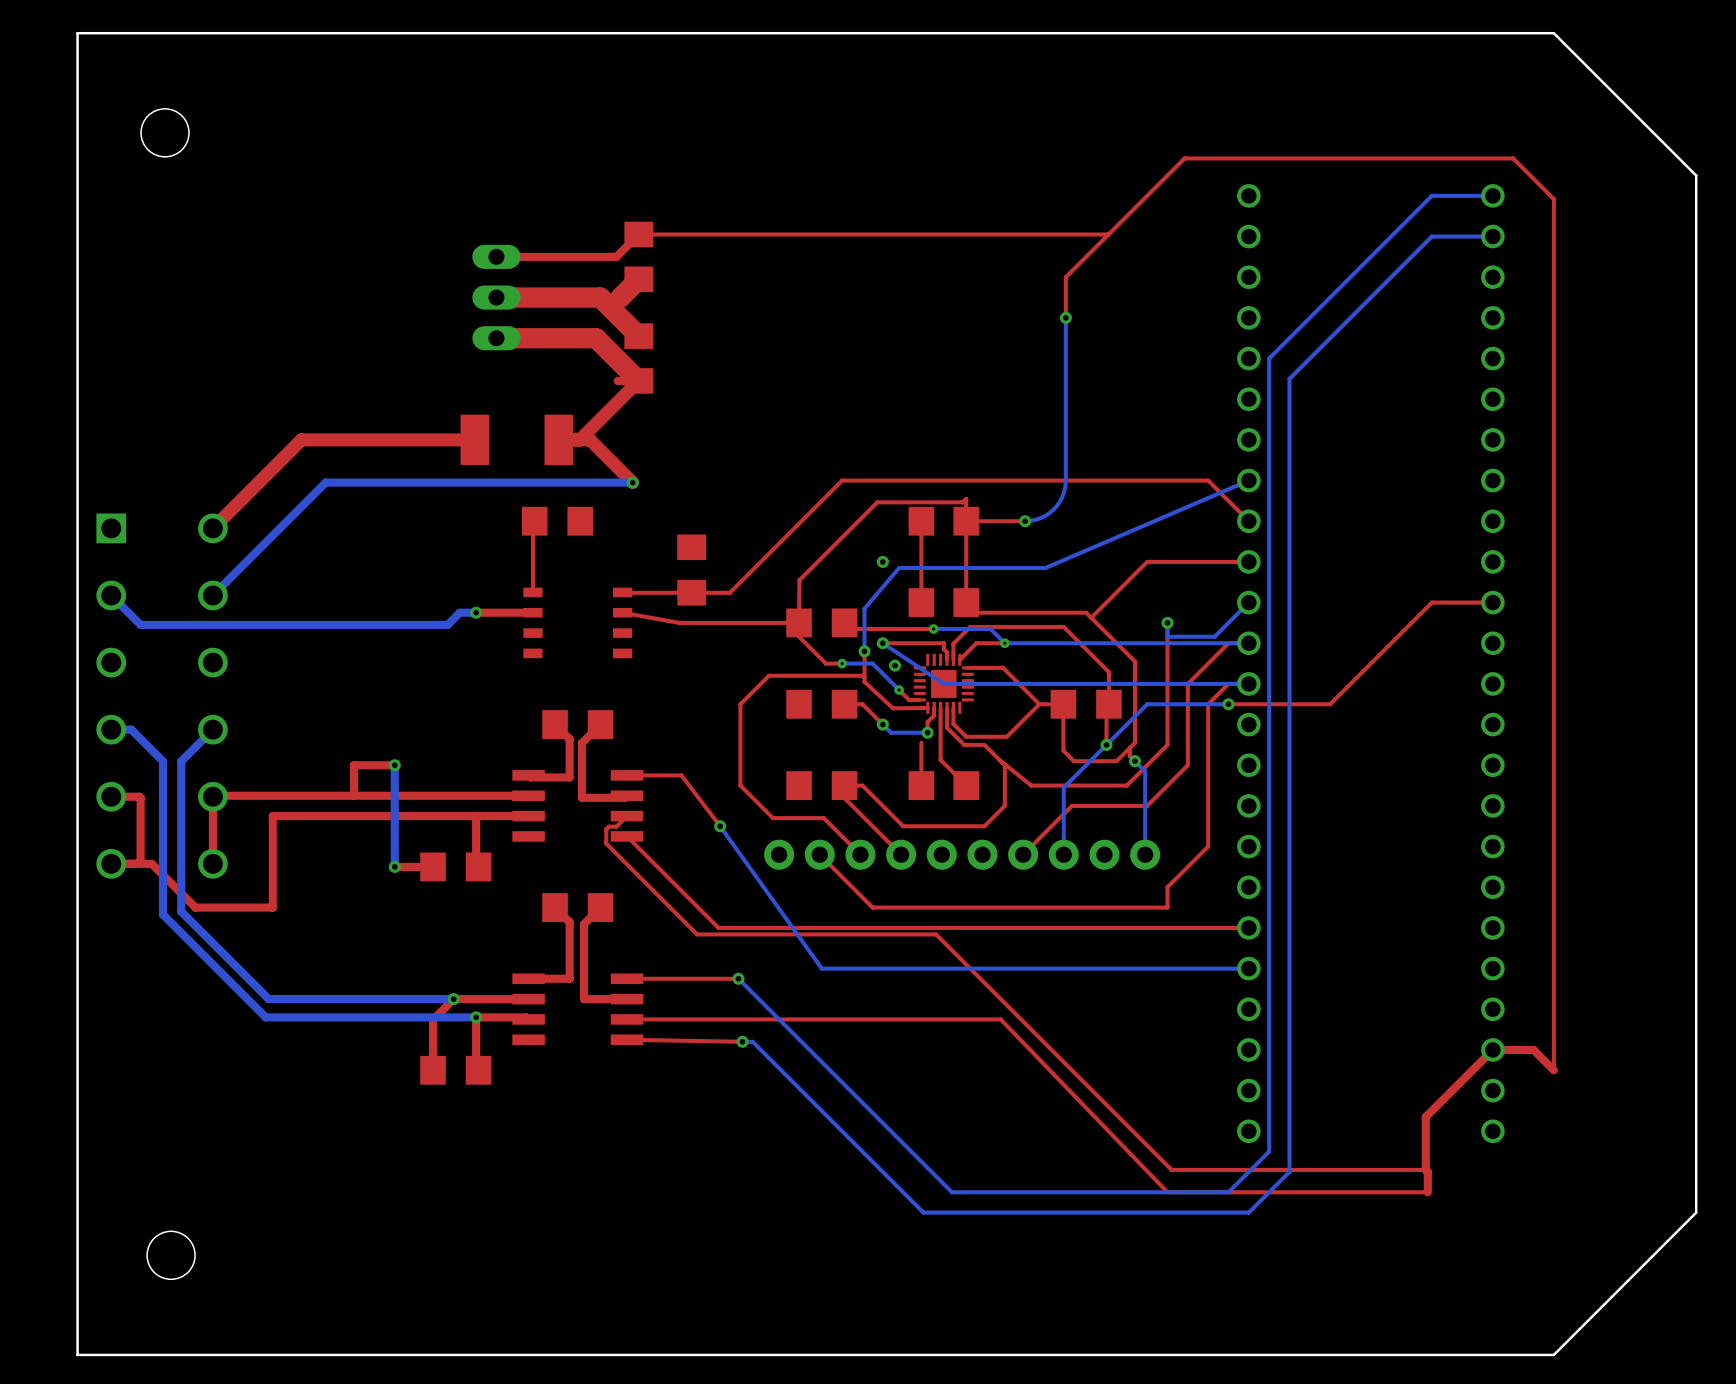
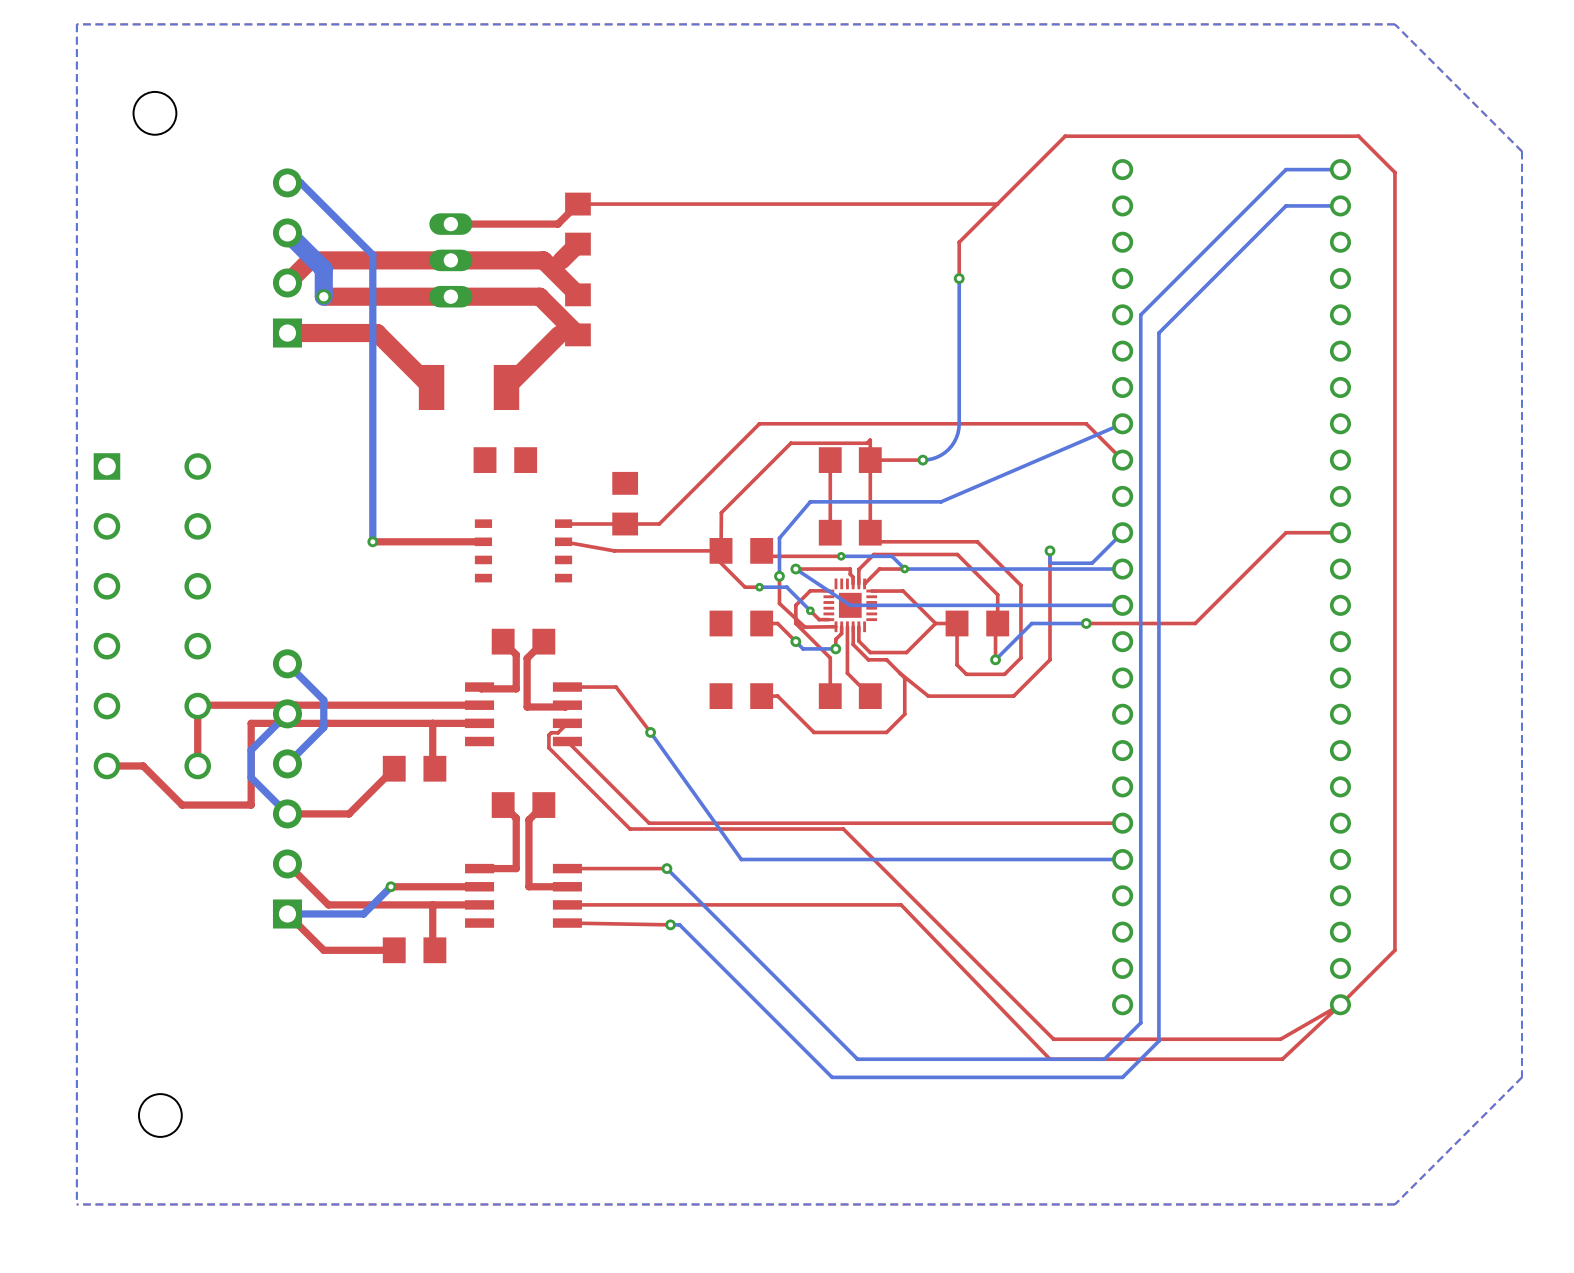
board edge: (1553, 33) (1696, 175) (1696, 1212) (1553, 1354) (77, 1354) (77, 33) (1553, 33) -> none
bottom track: none -> (287, 182) (300, 182) (372, 254) (372, 541)
bottom track: none -> (287, 232) (323, 269) (323, 296)
part: none -> (287, 257)
top track: none -> (450, 260) (310, 260) (287, 282)
via: none -> (323, 296)
top track: none -> (450, 296) (323, 296)
top track: (632, 387) (638, 380) (579, 439) -> none
top track: (474, 439) (301, 439) (212, 528) -> (431, 387) (377, 333) (287, 333)
top track: (558, 439) (589, 439) (632, 482) -> (506, 387) (559, 334)
via: (632, 482) -> none
bottom track: (634, 482) (325, 482) (212, 595) -> none
top track: (534, 521) (532, 522) (532, 592) -> none
via: (882, 561) -> none
top track: (1248, 561) (1147, 561) (1091, 617) -> none
bottom track: (111, 595) (140, 624) (447, 624) (459, 612) (476, 612) -> none
top track: none -> (432, 541) (372, 541)
via position: (476, 612) -> (372, 541)
top track: (1248, 643) (1228, 643) (1187, 683) (1187, 765) (1147, 805) (1071, 805) (1023, 854) -> none
via: (895, 665) -> none
top track: none -> (828, 590) (810, 590) (795, 605) (795, 623) (830, 657)
top track: (864, 677) (862, 675) (768, 675) (740, 704) (740, 785) (773, 818) (823, 818) (860, 854) -> none
top track: (1248, 683) (1228, 683) (1208, 704) (1208, 846) (1167, 887) (1167, 907) (872, 907) (819, 854) -> none
top track: none -> (1104, 623) (1086, 623)
bottom track: (1228, 704) (1208, 704) -> none
via position: (1228, 704) -> (1086, 623)
bottom track: (111, 729) (131, 729) (162, 761) (162, 914) (265, 1017) (476, 1017) -> none
bottom track: (212, 729) (181, 761) (181, 911) (268, 999) (453, 999) -> none
bottom track: (1106, 744) (1063, 787) (1063, 854) -> none
top track: (1129, 747) (1129, 756) (1134, 761) -> none
bottom track: none -> (287, 663) (323, 700) (323, 727) (287, 763)
bottom track: (1134, 761) (1145, 771) (1145, 854) -> none
via: (1134, 761) -> none
top track: (394, 765) (354, 765) (354, 795) -> none
bottom track: (394, 765) (394, 866) -> none
via: (394, 765) -> none
top track: (844, 785) (844, 798) (901, 854) -> none
top track: (111, 796) (140, 797) (139, 863) -> none
bottom track: none -> (287, 713) (251, 750) (251, 777) (287, 813)
part: (962, 854) -> none
via: (394, 866) -> none
top track: (433, 866) (394, 866) -> (394, 768) (349, 813) (287, 813)
part: none -> (287, 788)
bottom track: none -> (390, 886) (363, 913) (287, 913)
top track: (453, 999) (433, 1019) (433, 1070) -> (412, 886) (390, 886)
via position: (453, 999) -> (390, 886)
via: (476, 1017) -> none
top track: (528, 1019) (526, 1017) (476, 1017) (476, 1019) -> (479, 904) (328, 904) (287, 863)
top track: none -> (287, 913) (323, 950) (394, 950)
top track: (1553, 1070) (1533, 1049) (1492, 1049) (1425, 1117) (1427, 1192) -> (1340, 1004) (1282, 1059)
top track: none -> (1394, 950) (1340, 1004)
top track: none -> (1340, 1004) (1280, 1039)

